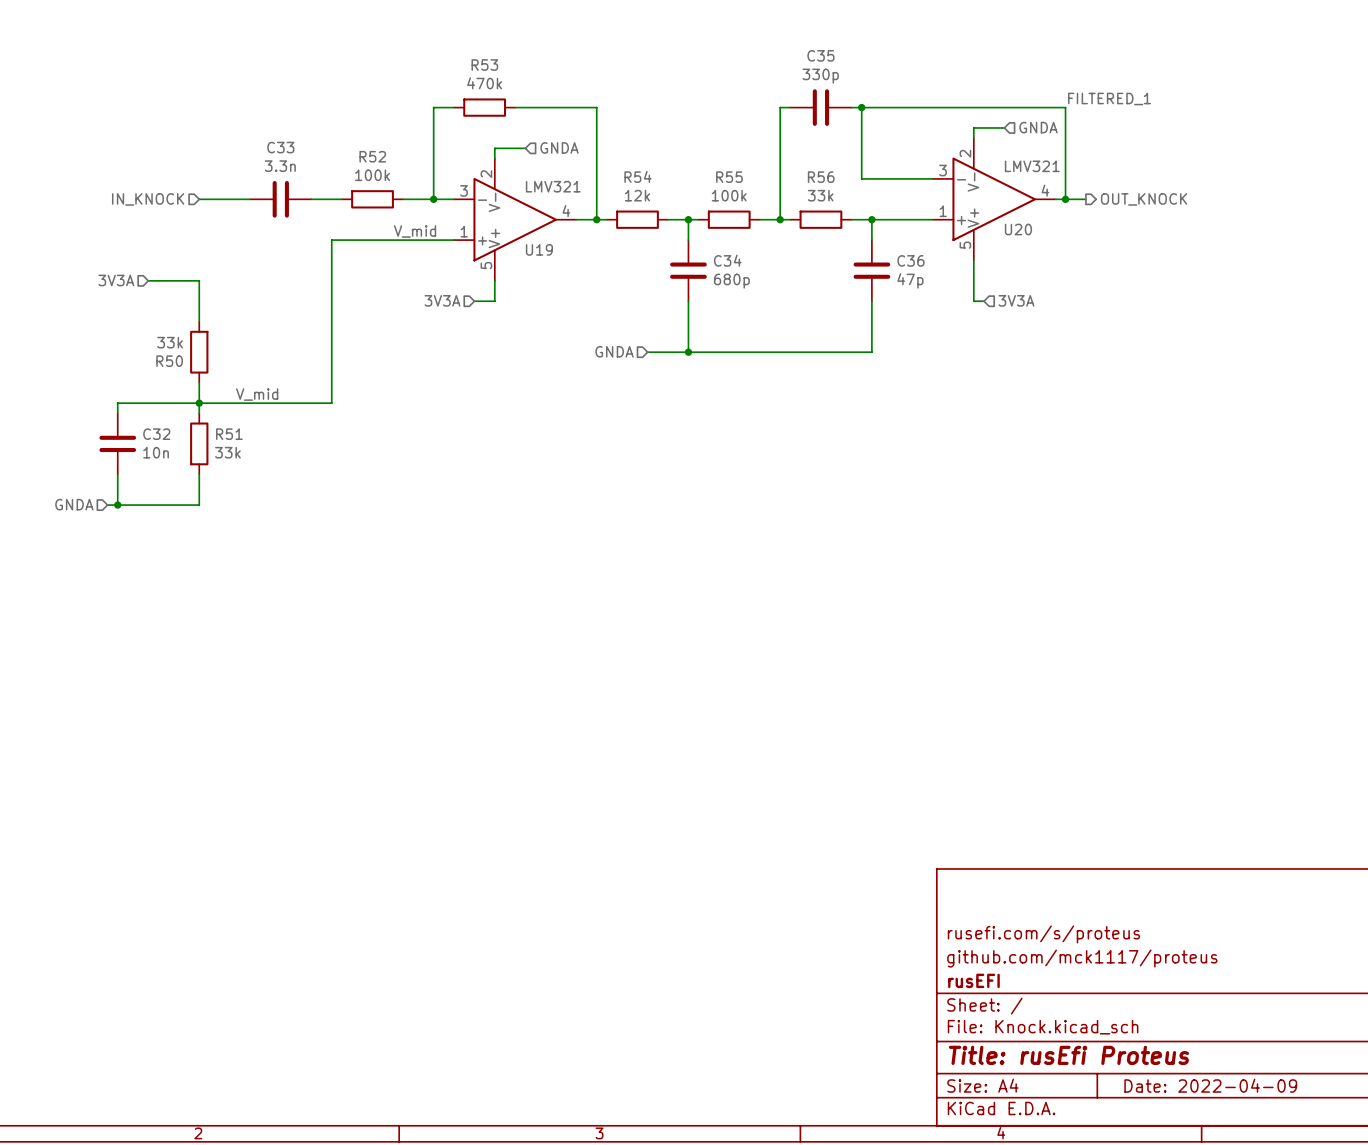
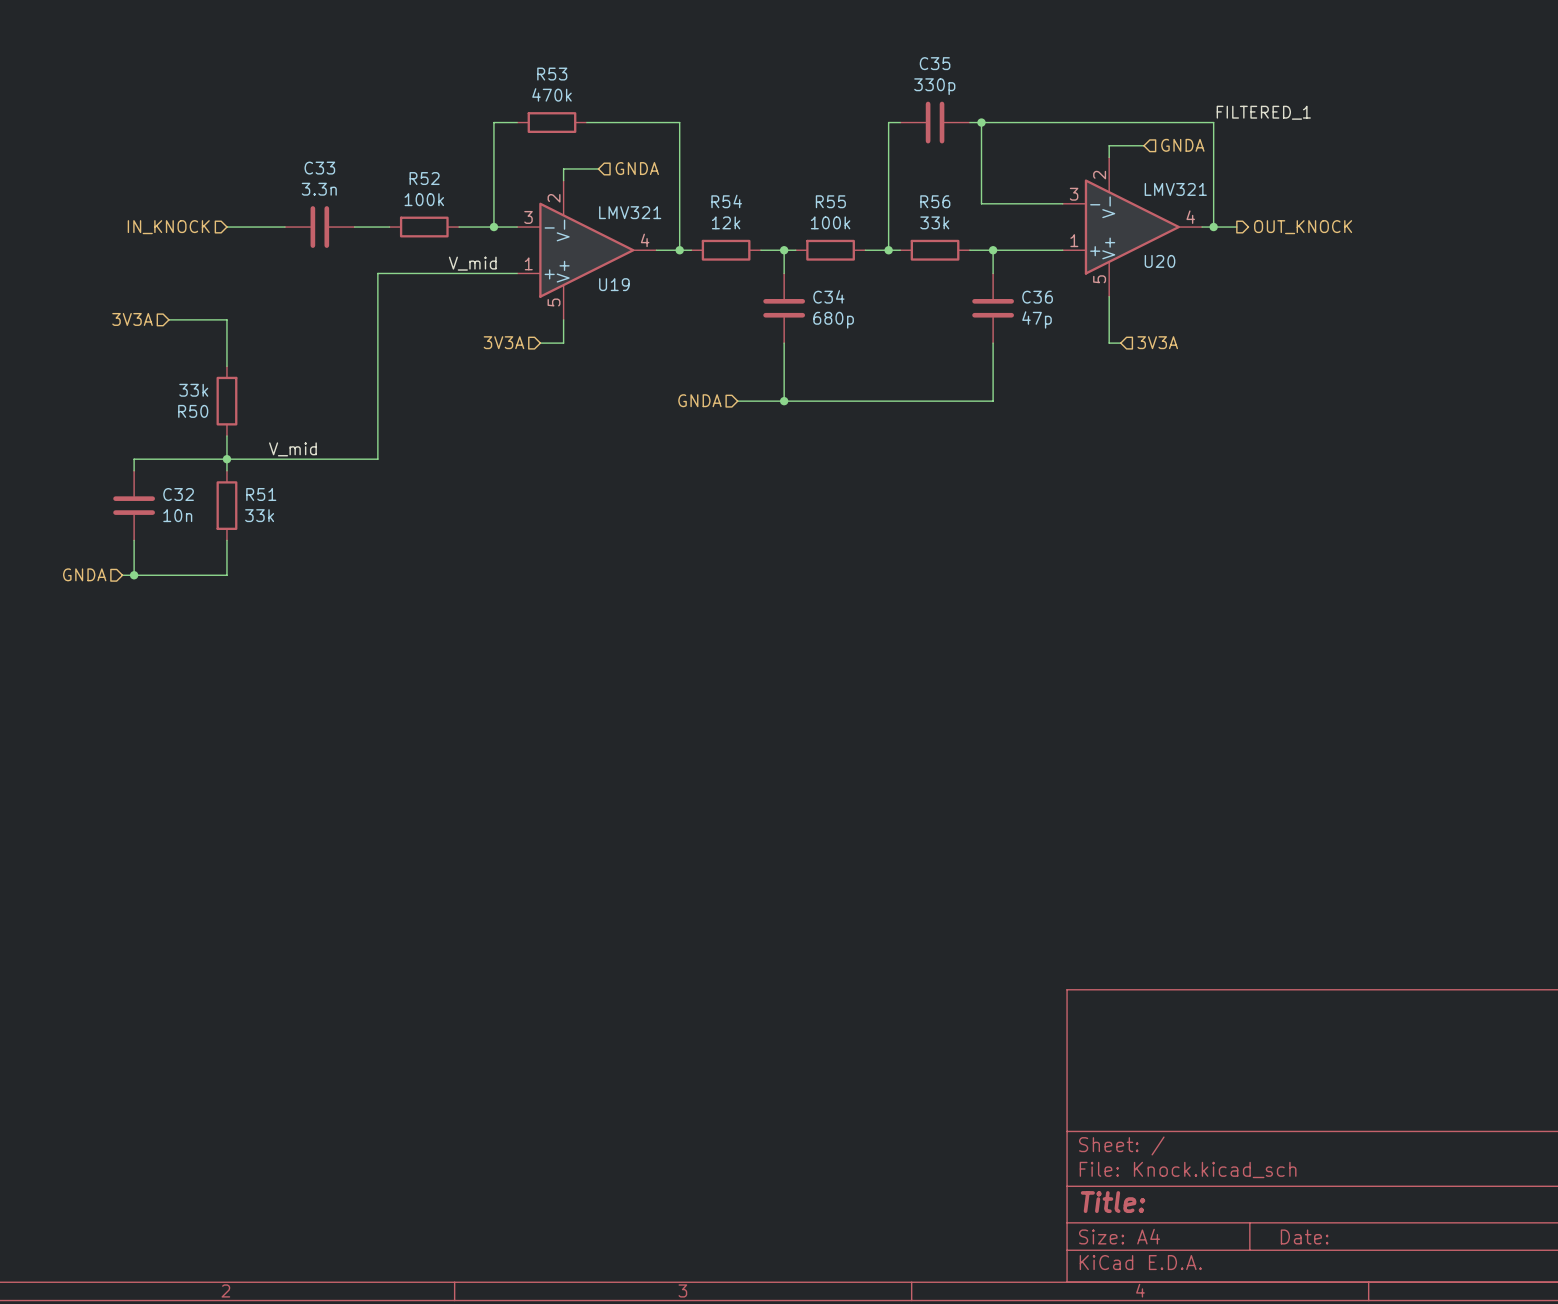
title block: rusefi.com/s/proteus (1043, 934) -> none
title block: github.com/mck1117/proteus (1082, 958) -> none
title block: rusEFI (973, 980) -> none
title block: Title: rusEfi Proteus (1068, 1055) -> Title: (1113, 1202)
title block: Date: 2022-04-09 (1210, 1085) -> Date: (1304, 1236)

